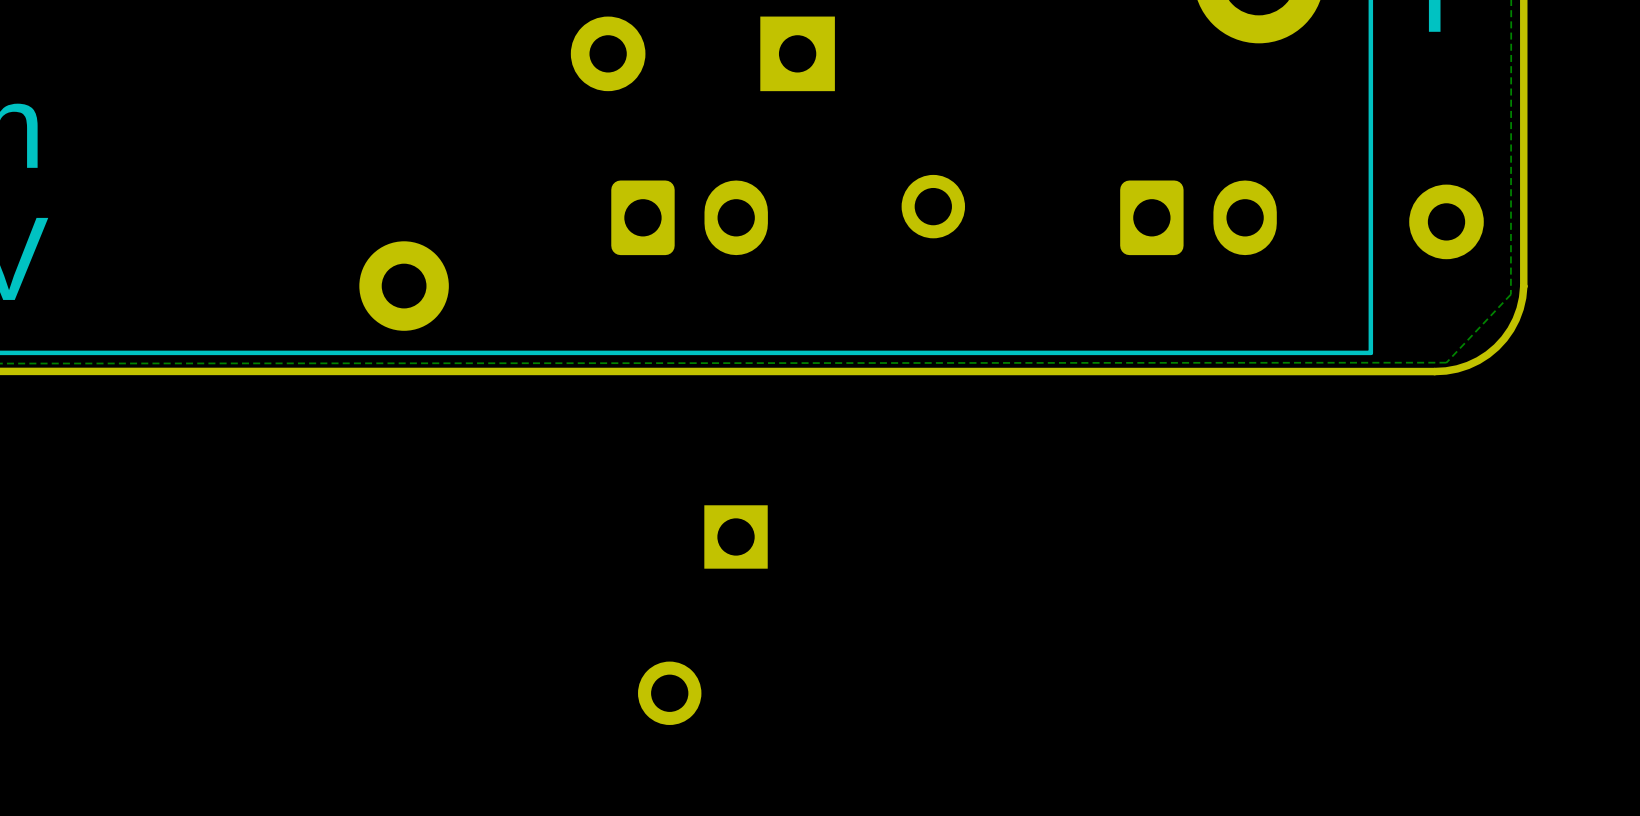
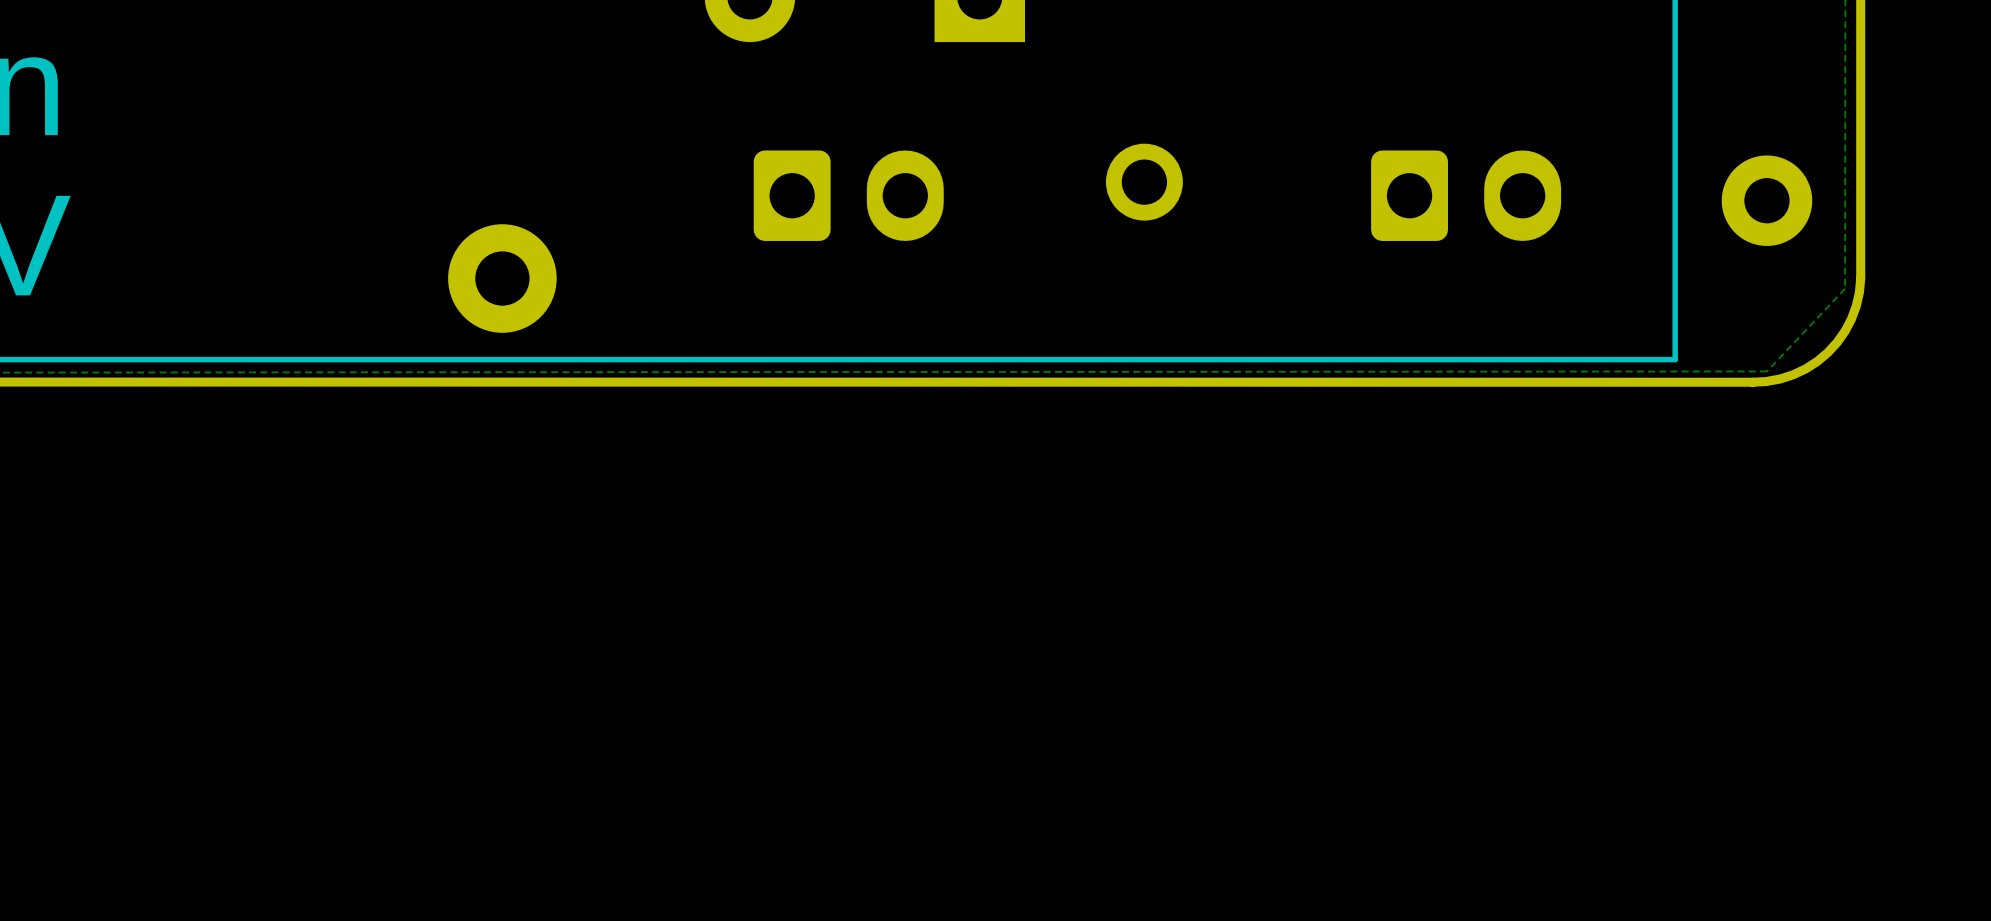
part: (736, 536) -> none
part: (669, 693) -> none

